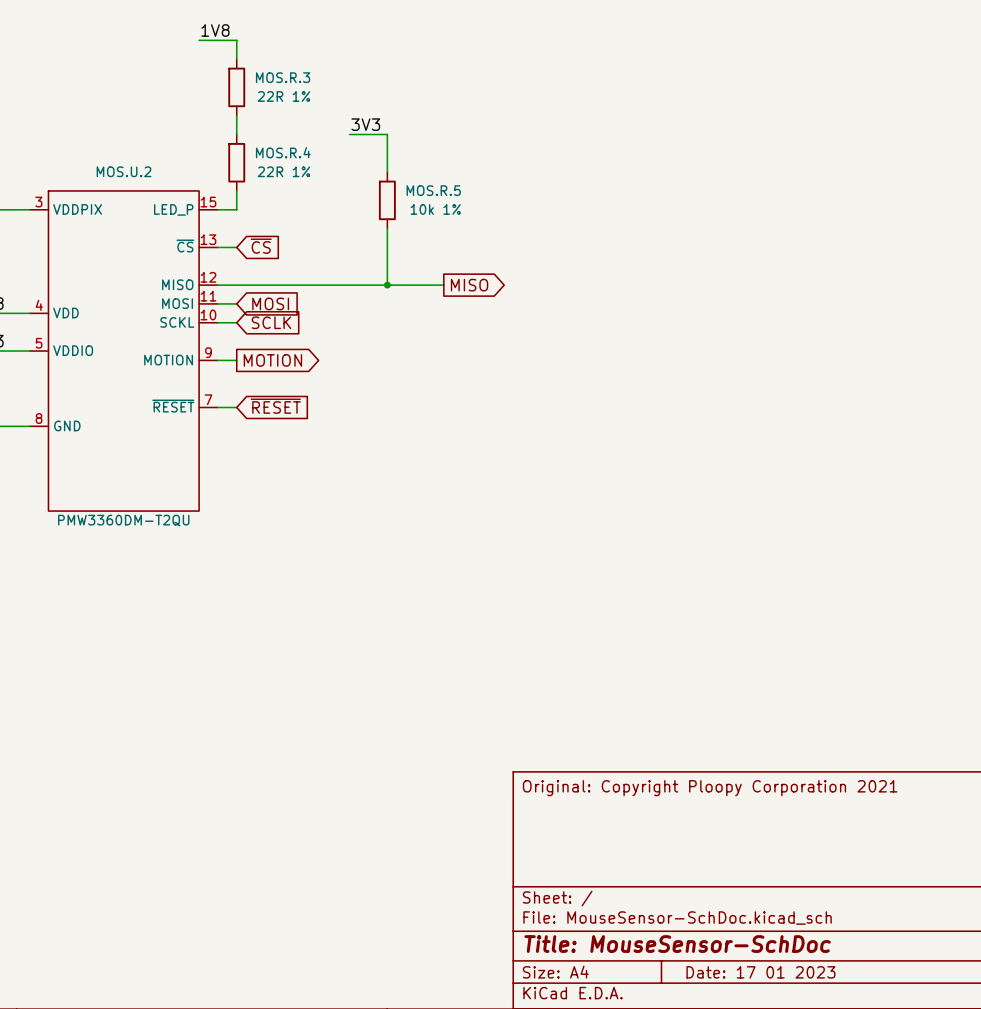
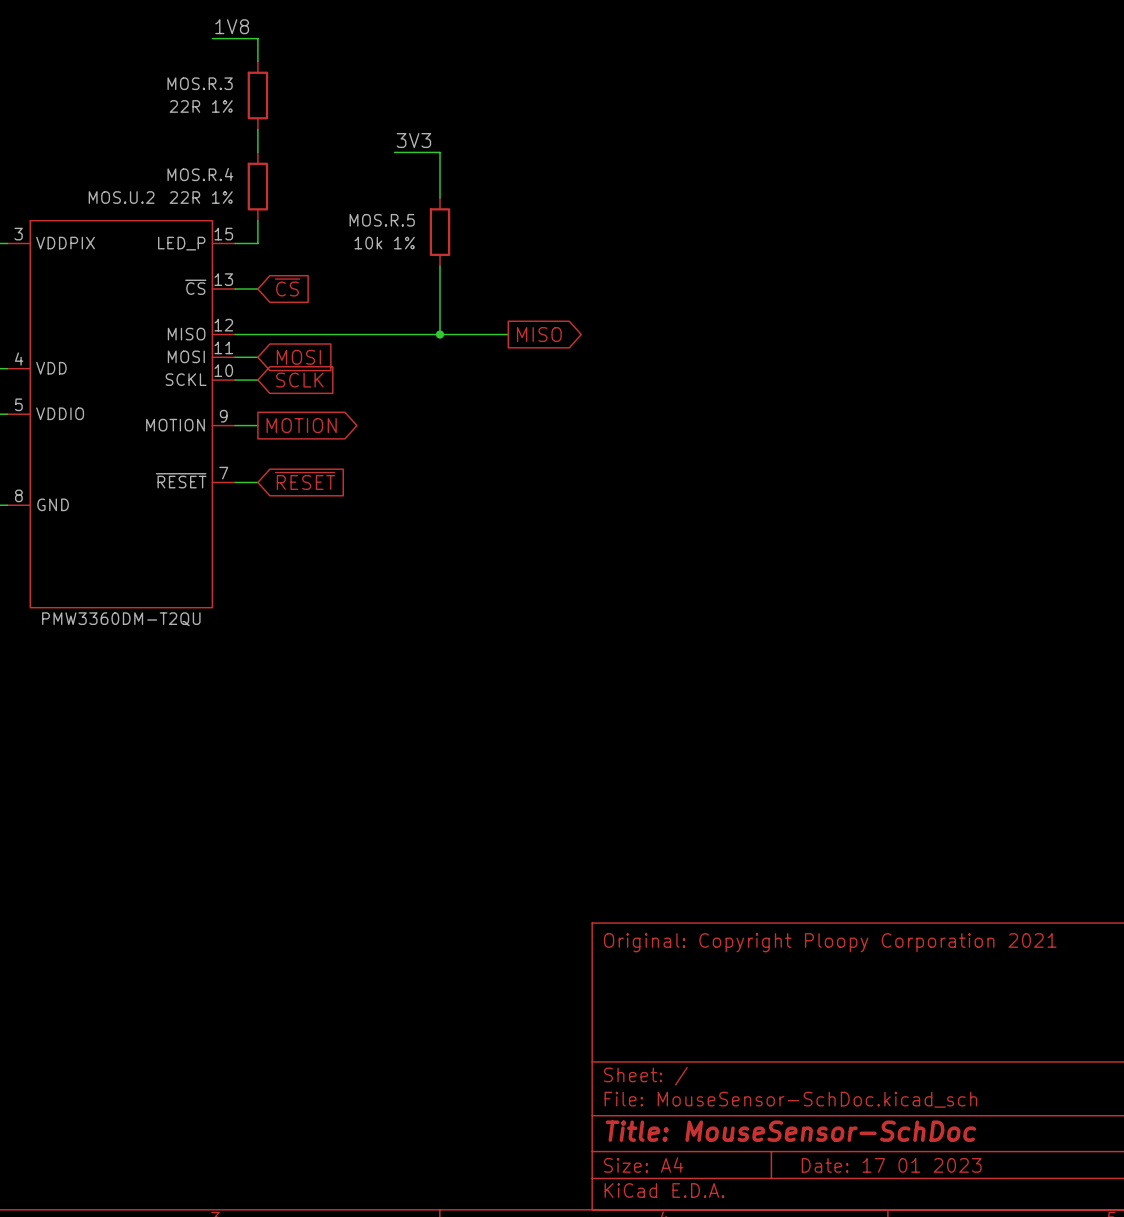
MOS.R.3 name position: MOS.R.3 (283, 77) -> MOS.R.3 (200, 83)
MOS.R.3 value position: 22R 1% (283, 96) -> 22R 1% (201, 106)
MOS.R.4 name position: MOS.R.4 (283, 152) -> MOS.R.4 (200, 174)
MOS.R.4 value position: 22R 1% (283, 171) -> 22R 1% (201, 197)
MOS.R.5 name position: MOS.R.5 (433, 190) -> MOS.R.5 (382, 220)
MOS.R.5 value position: 10k 1% (435, 209) -> 10k 1% (384, 243)

